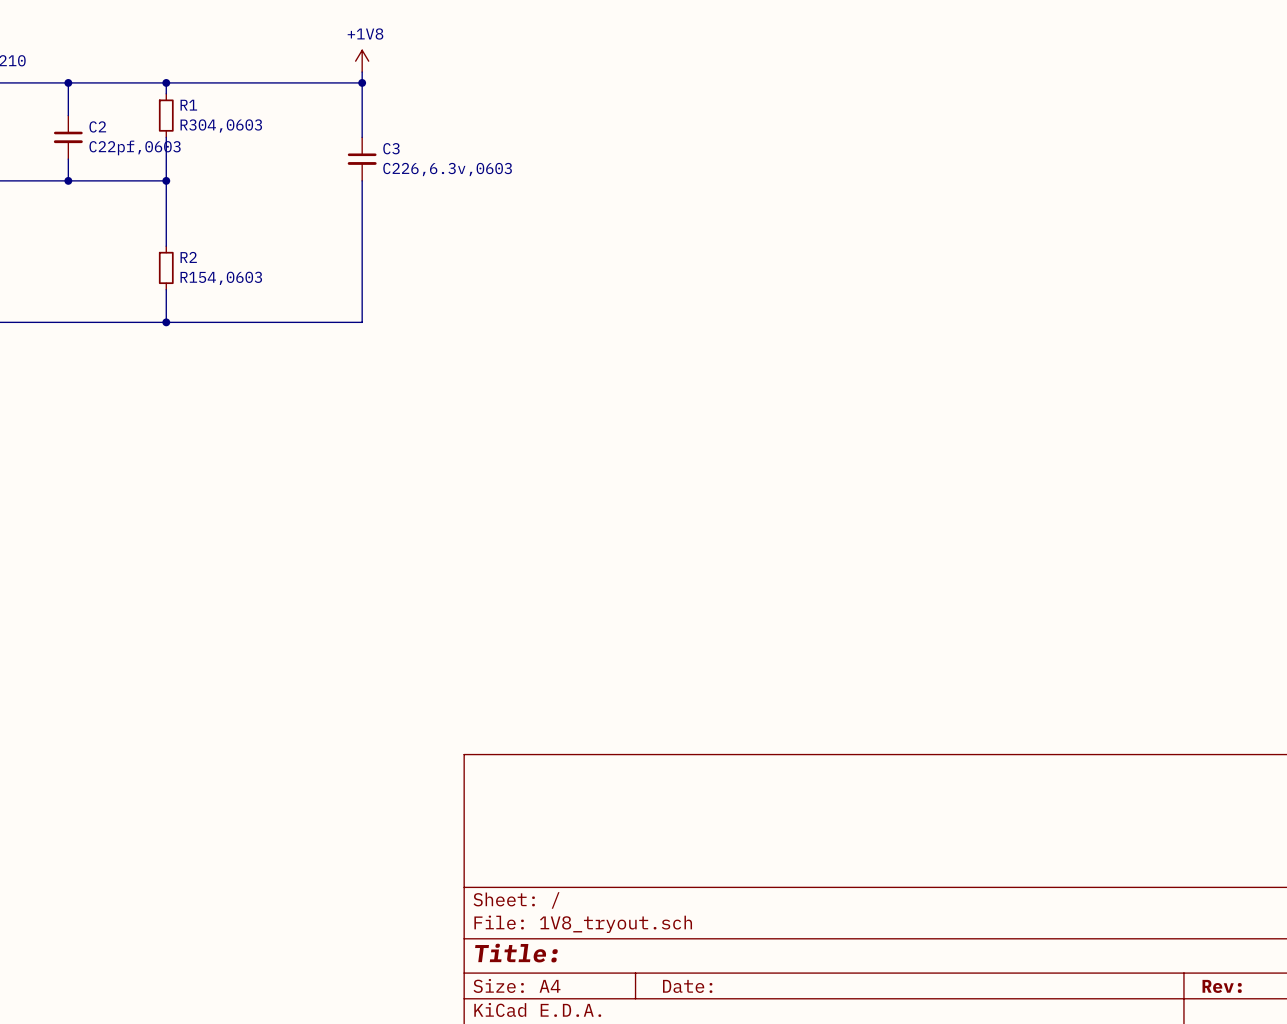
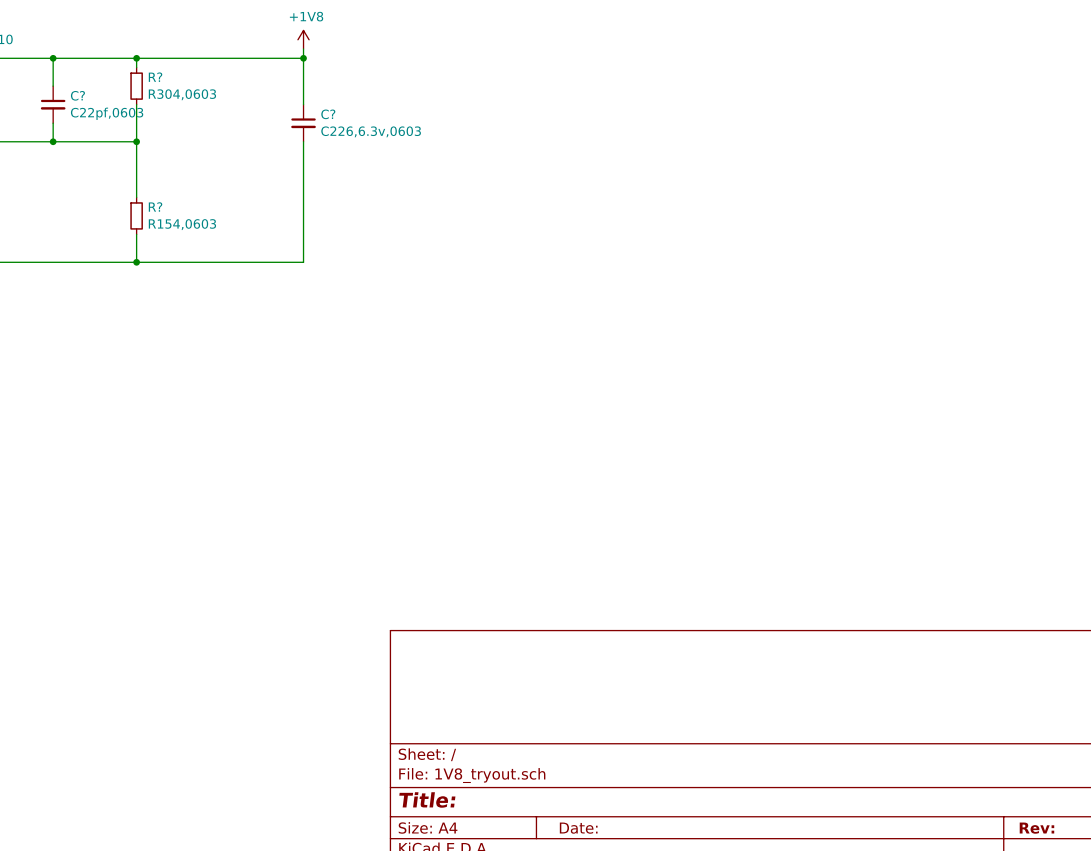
R1 name: R1 (188, 105) -> R? (155, 77)
C2 name: C2 (97, 126) -> C? (77, 95)
C3 name: C3 (391, 148) -> C? (328, 114)
R2 name: R2 (188, 257) -> R? (155, 206)

